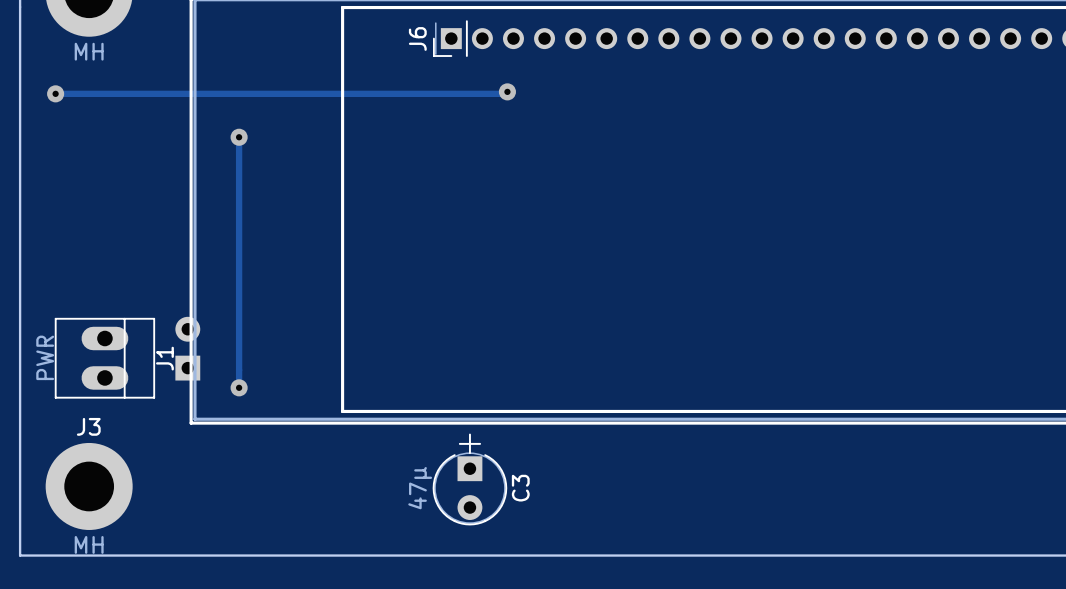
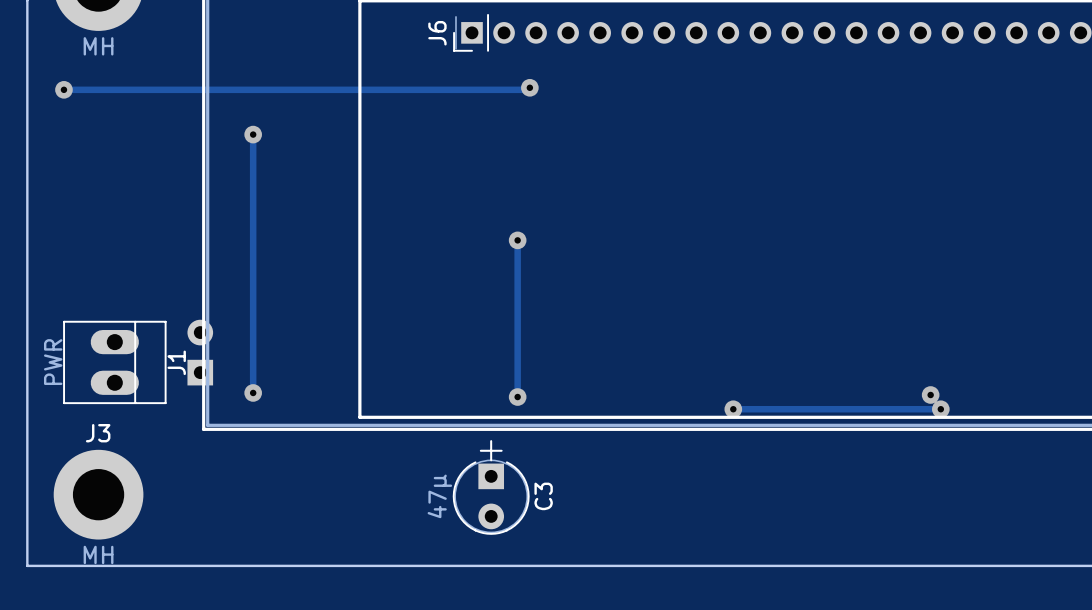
track: none -> (517, 240) (517, 397)
via: none -> (517, 240)
via: none -> (930, 394)
via: none -> (517, 397)
track: none -> (733, 409) (940, 409)
via: none -> (733, 409)
via: none -> (940, 409)

